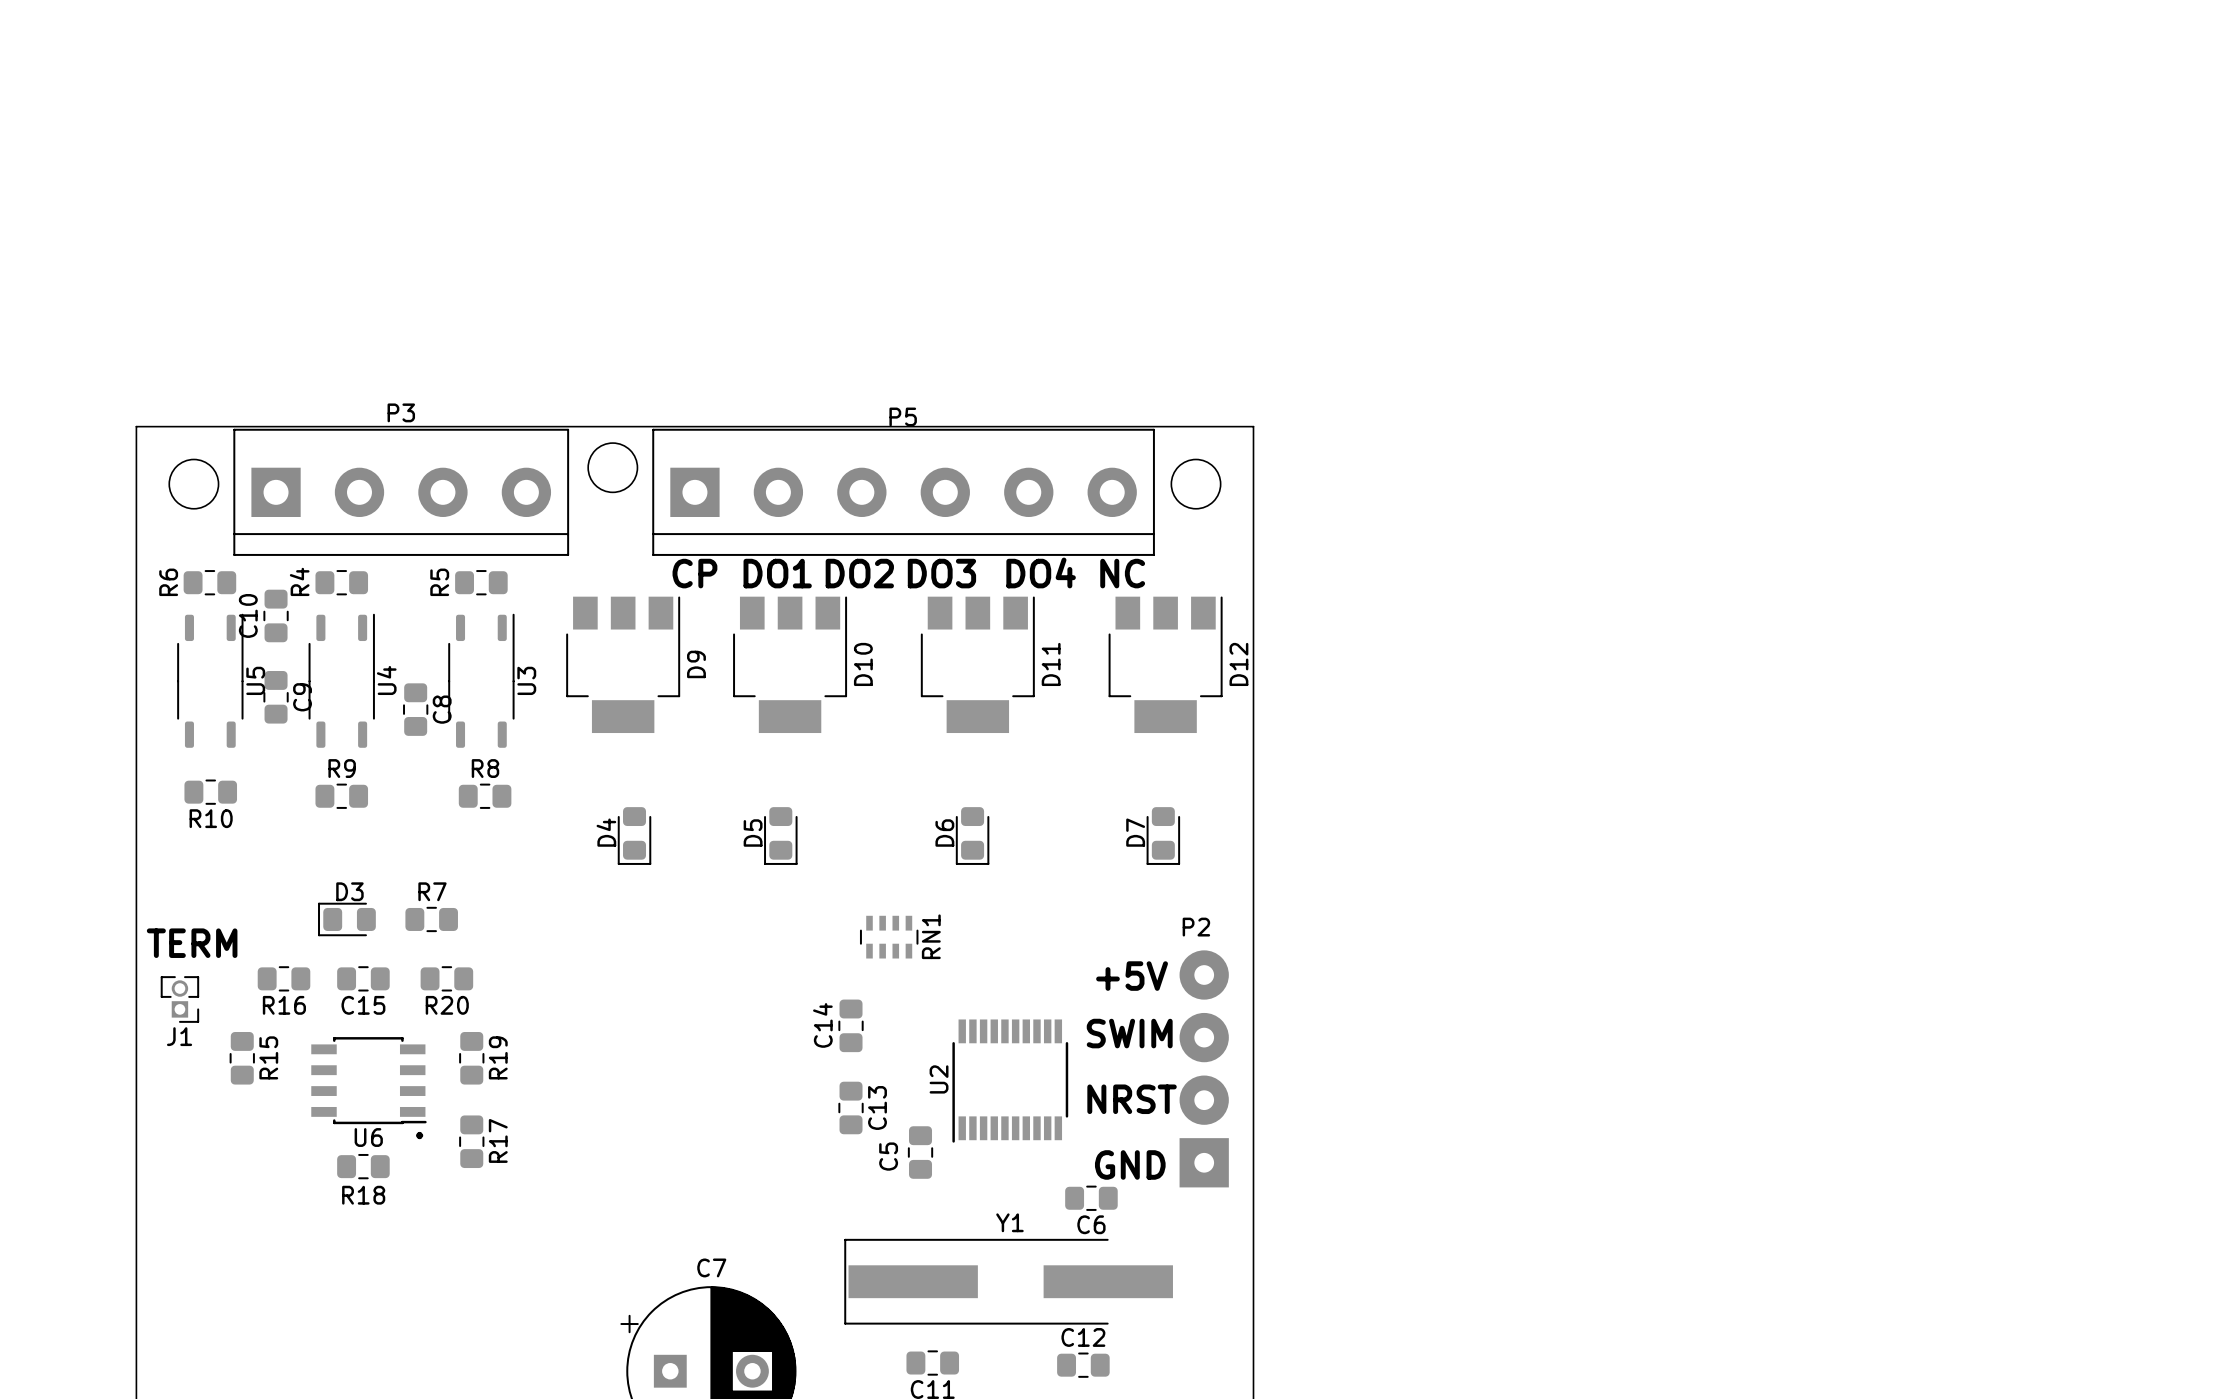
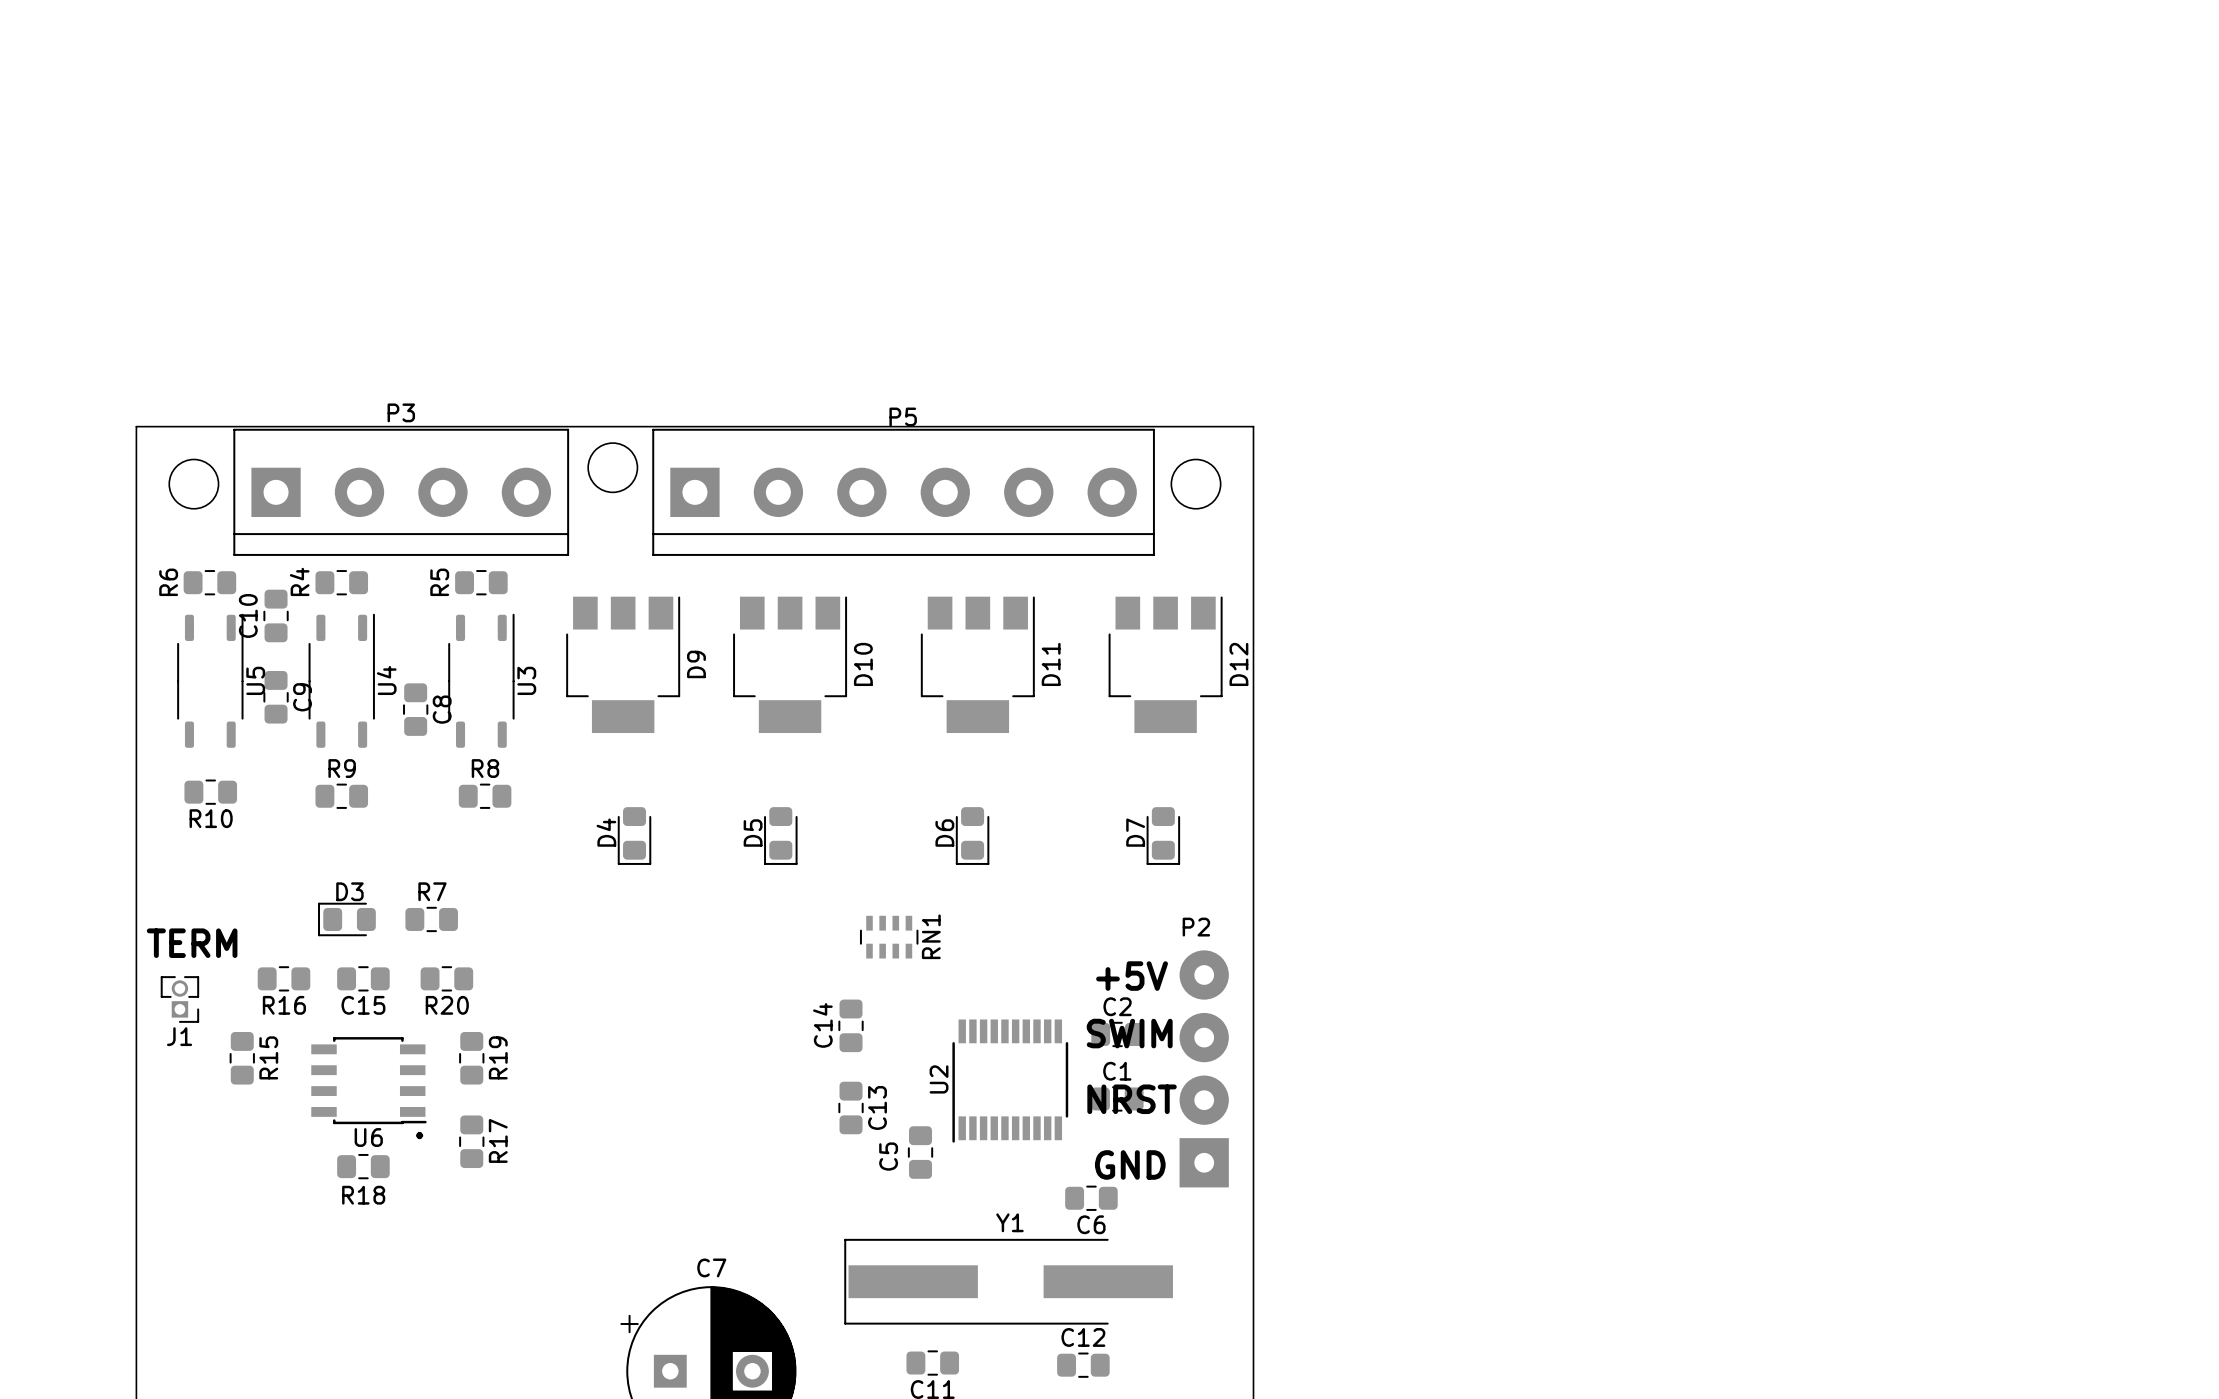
text: DO4 (1041, 572) -> none
text: CP (694, 573) -> none
text: DO1 (777, 573) -> none
text: DO2 (859, 573) -> none
text: DO3 (941, 573) -> none
text: NC (1122, 573) -> none
C2: none -> (1117, 1034)
C1: none -> (1117, 1098)

